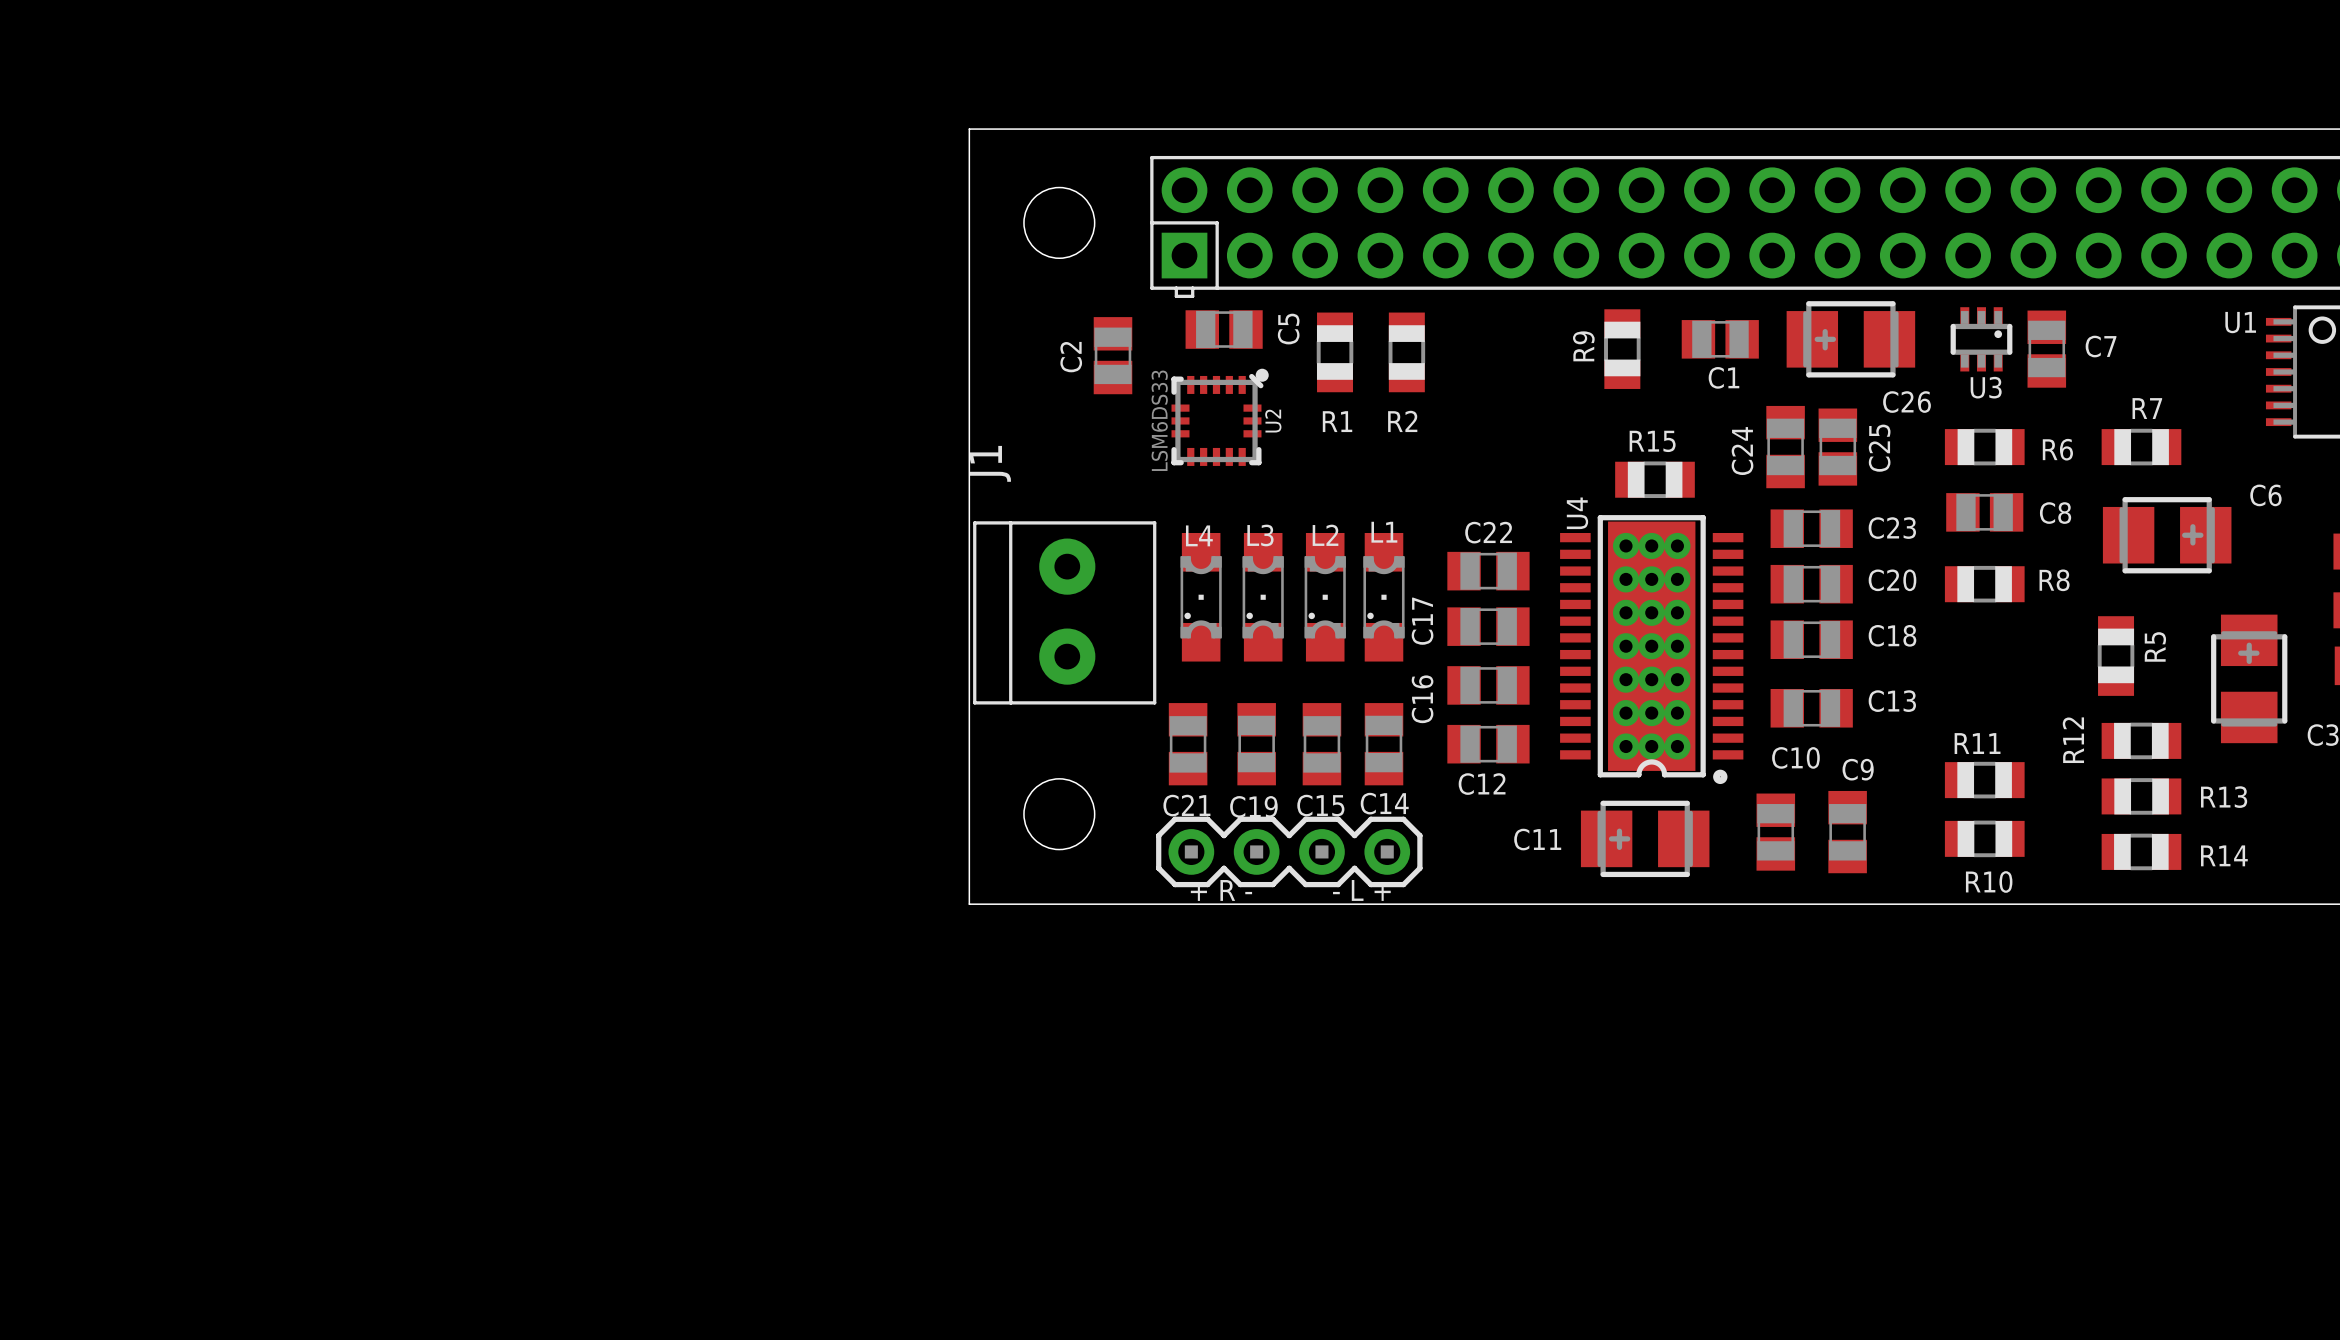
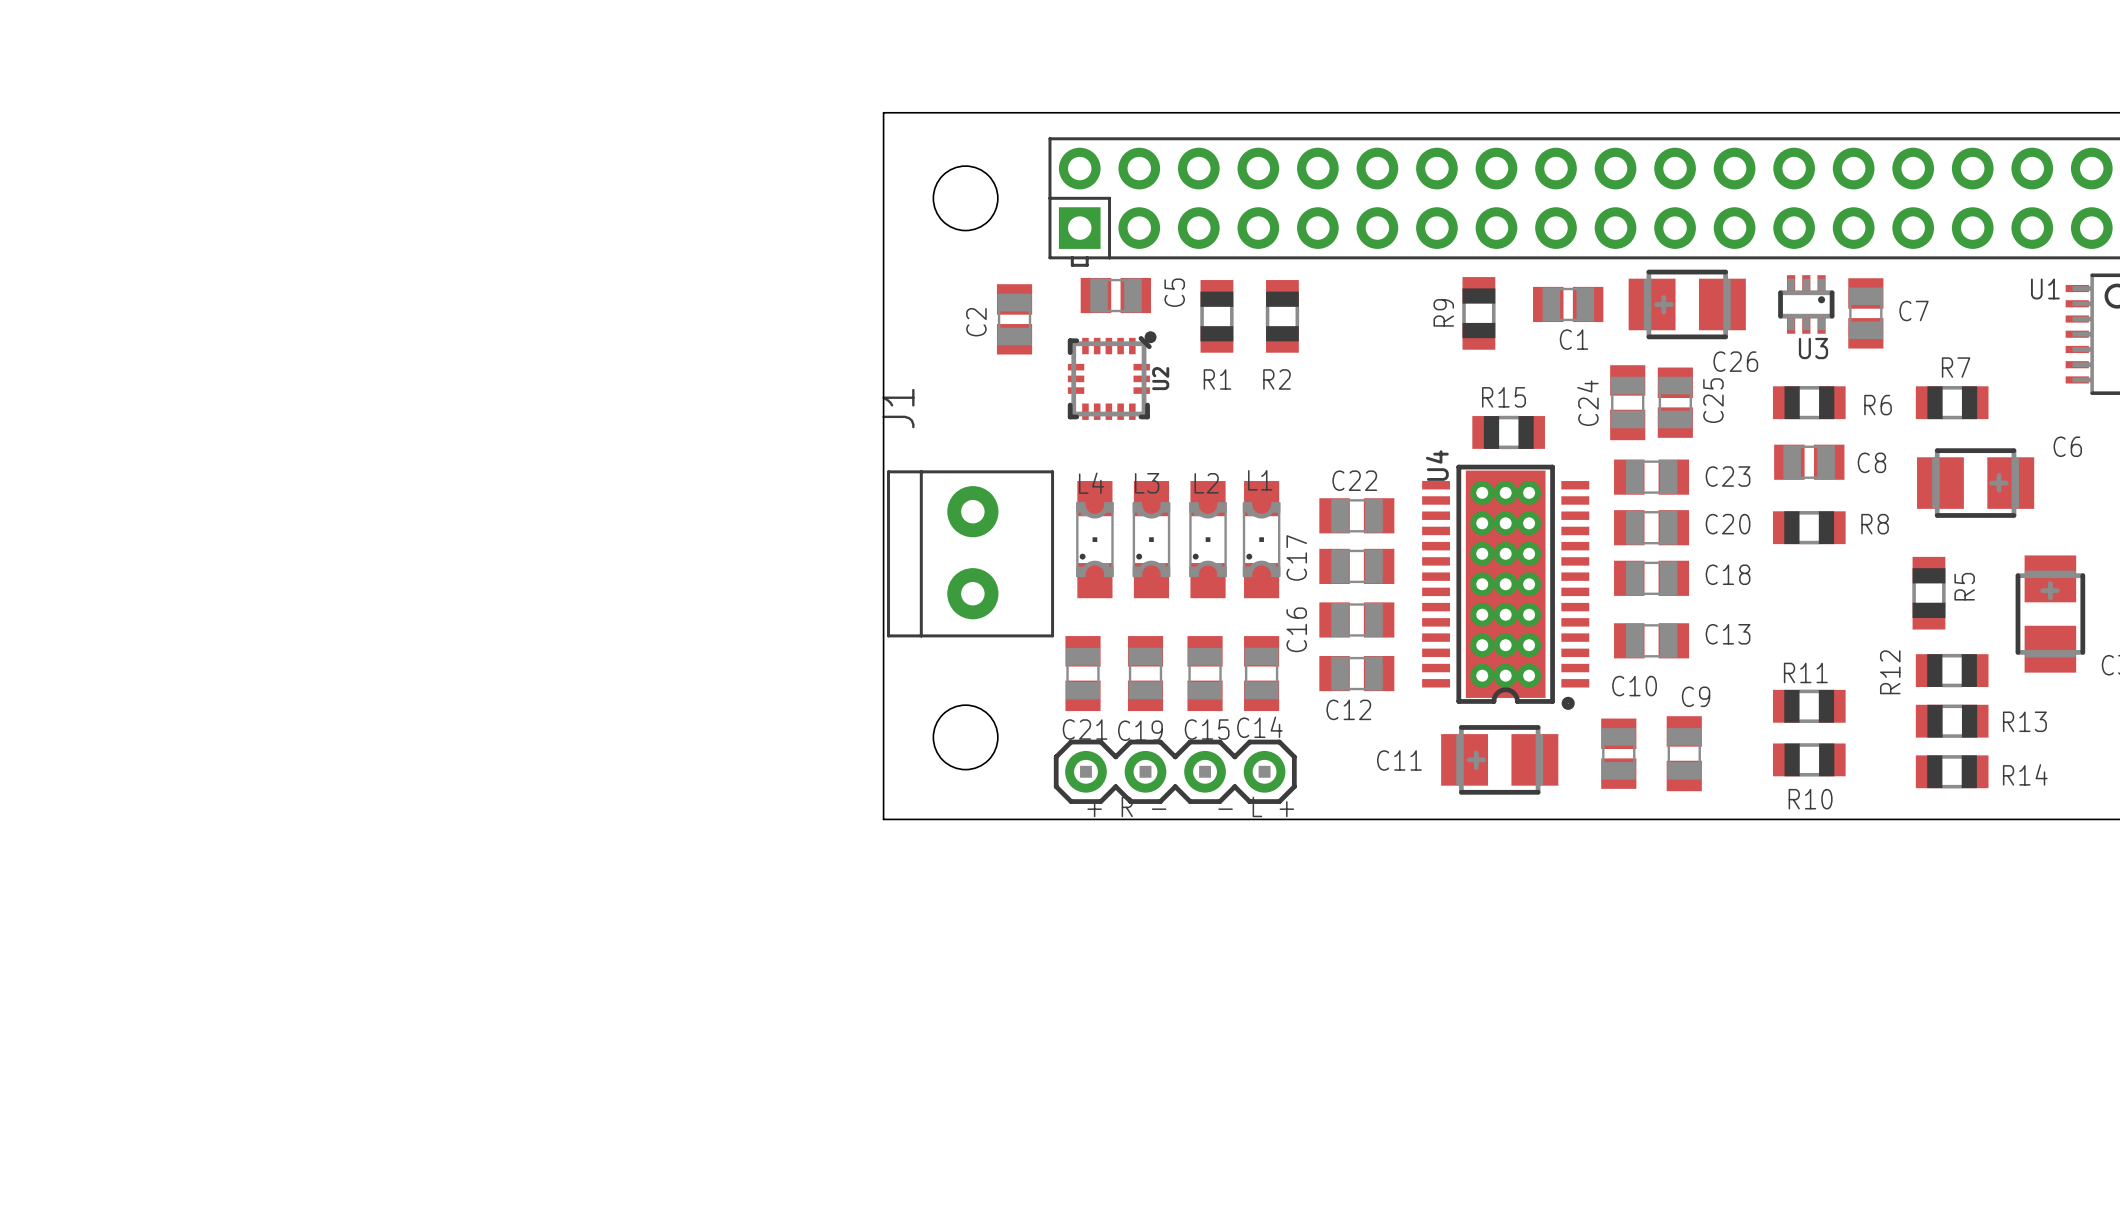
U2 value: LSM6DS33 (1159, 420) -> none

